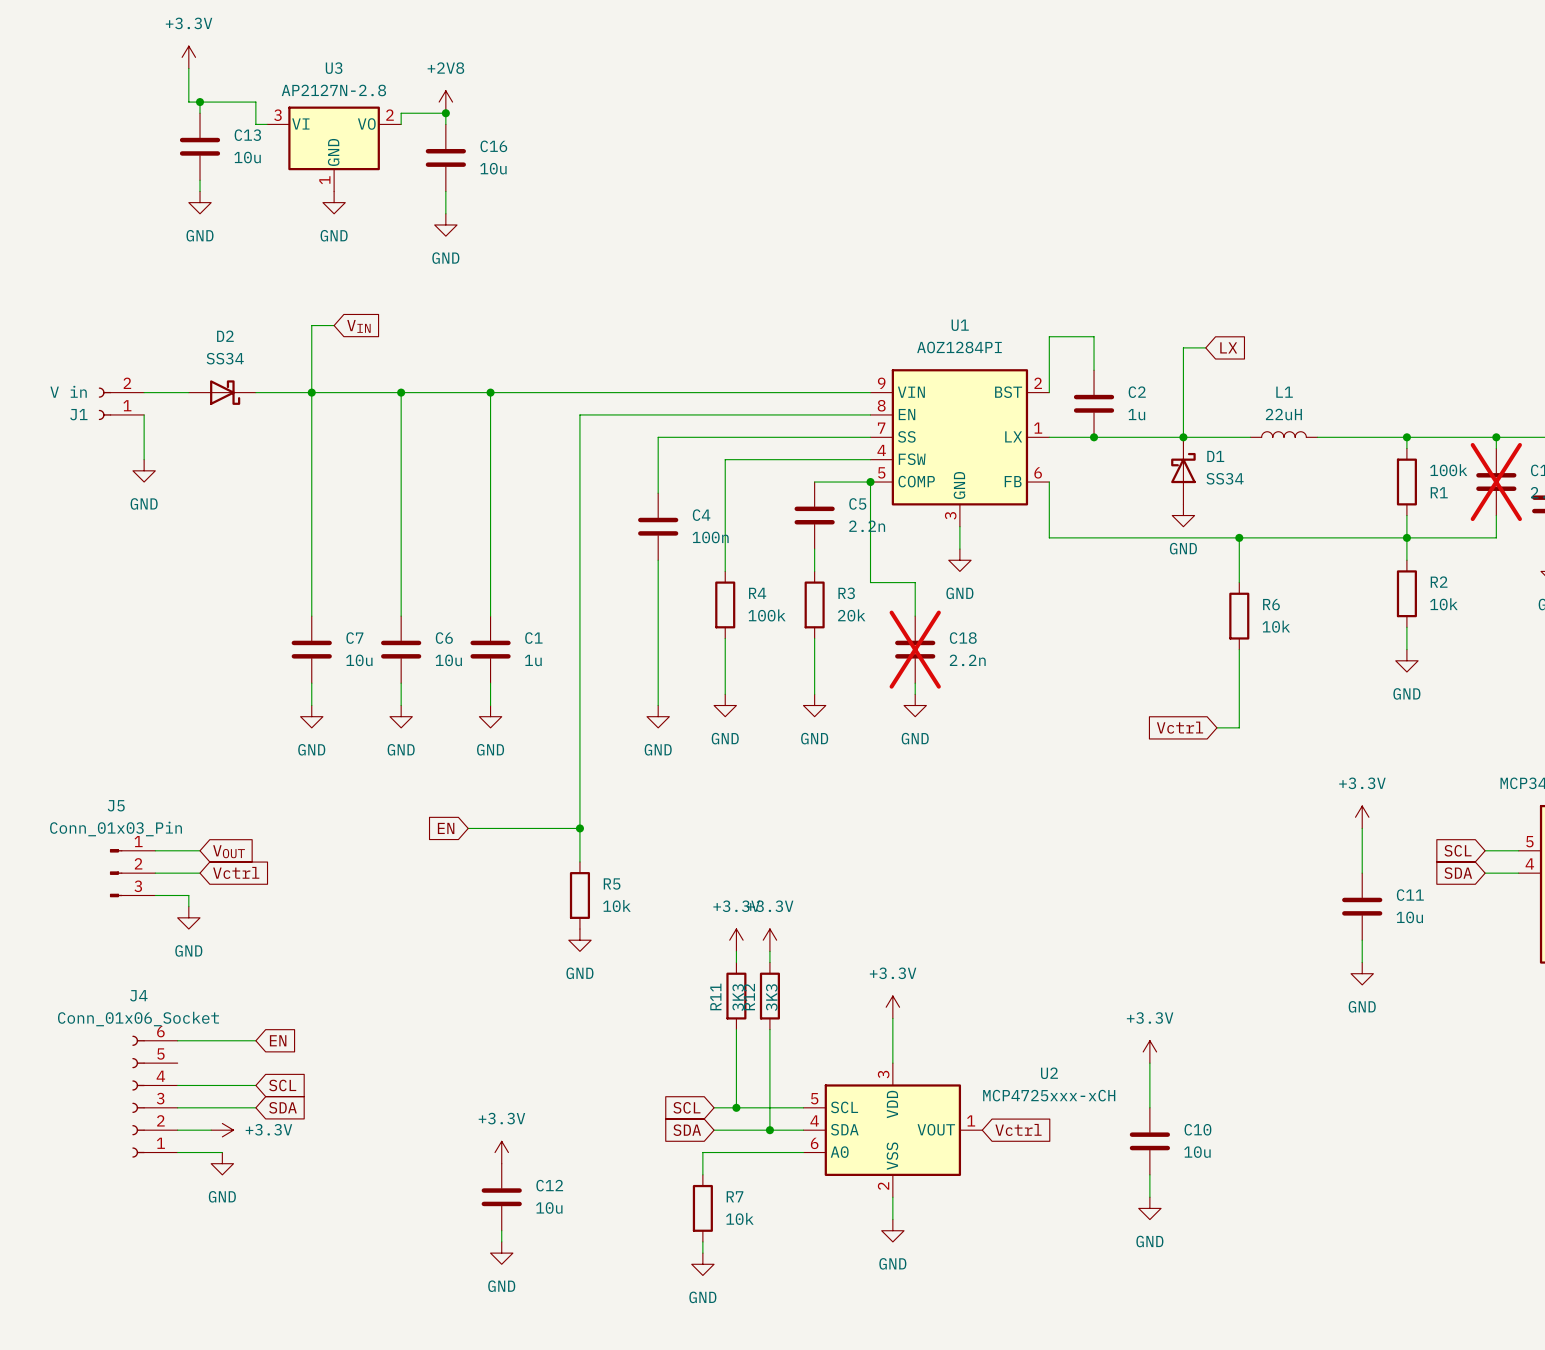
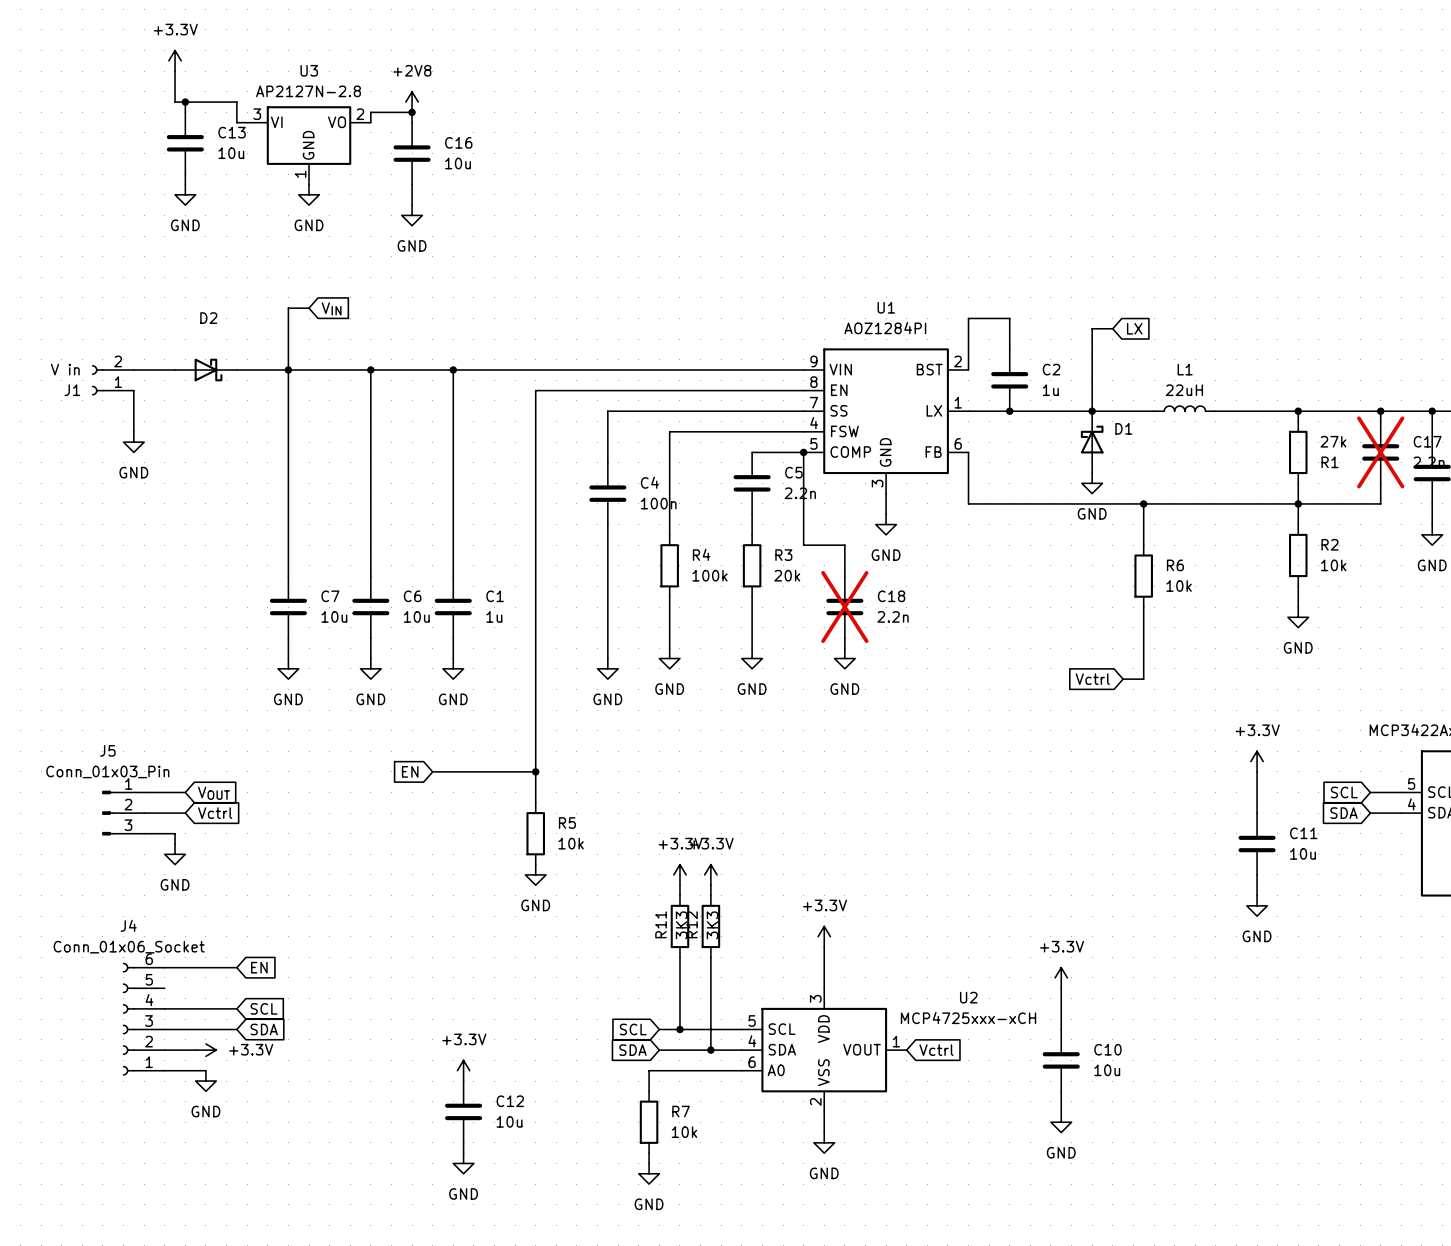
D2 value: SS34 (225, 358) -> none
R1 value: 100k (1448, 470) -> 27k (1333, 441)
D1 value: SS34 (1225, 478) -> none

